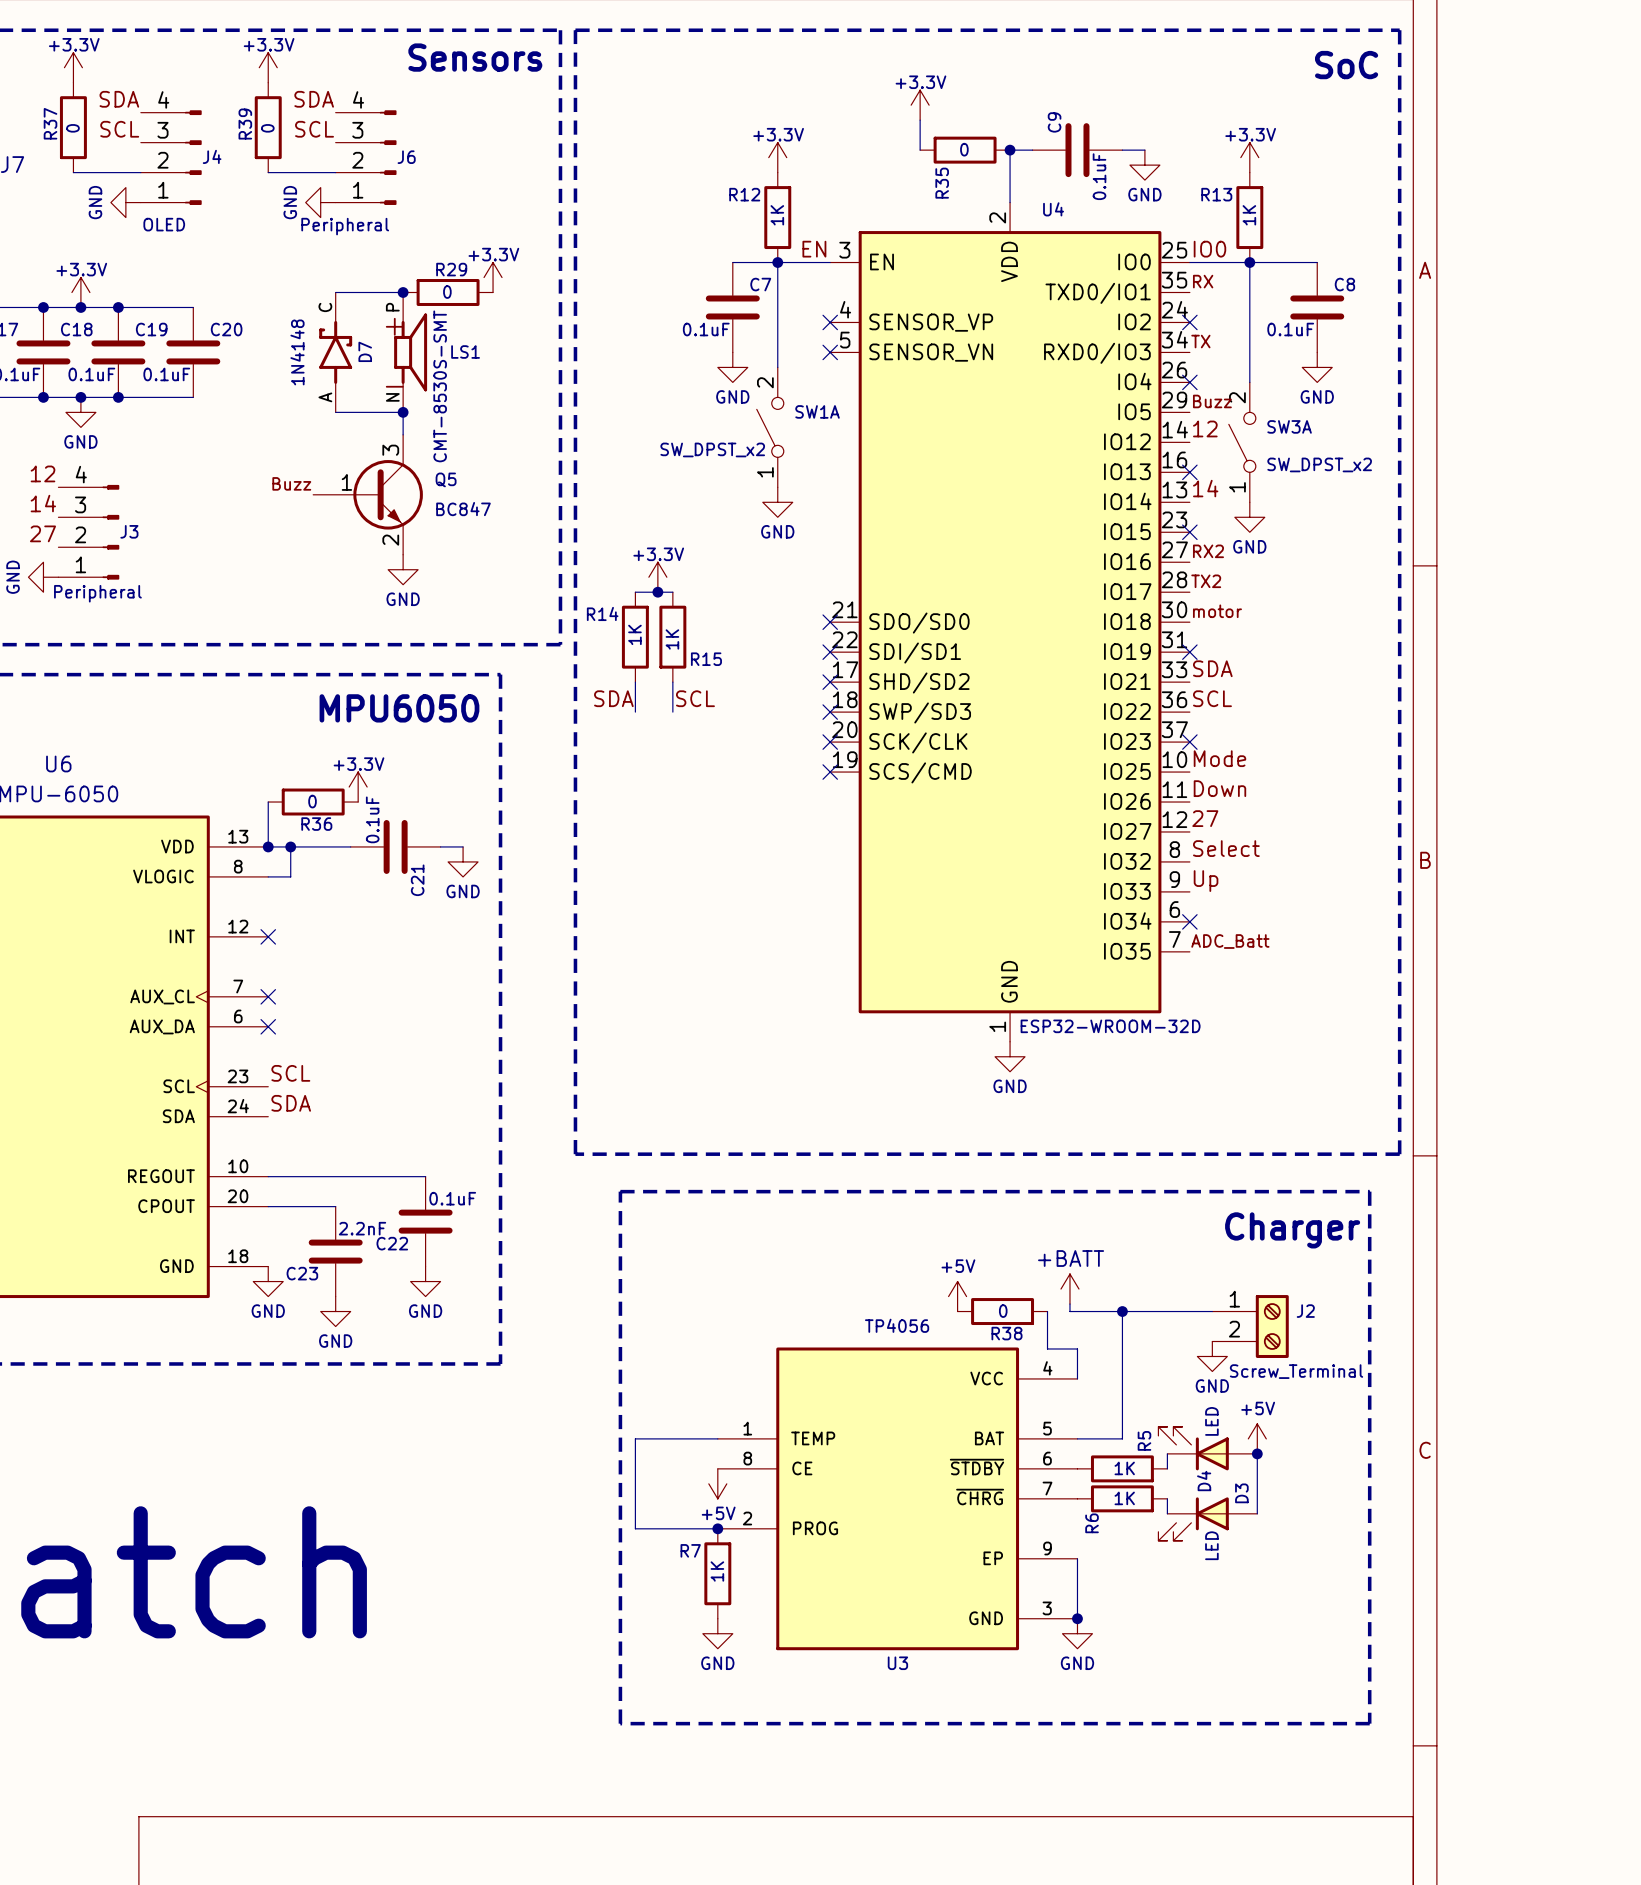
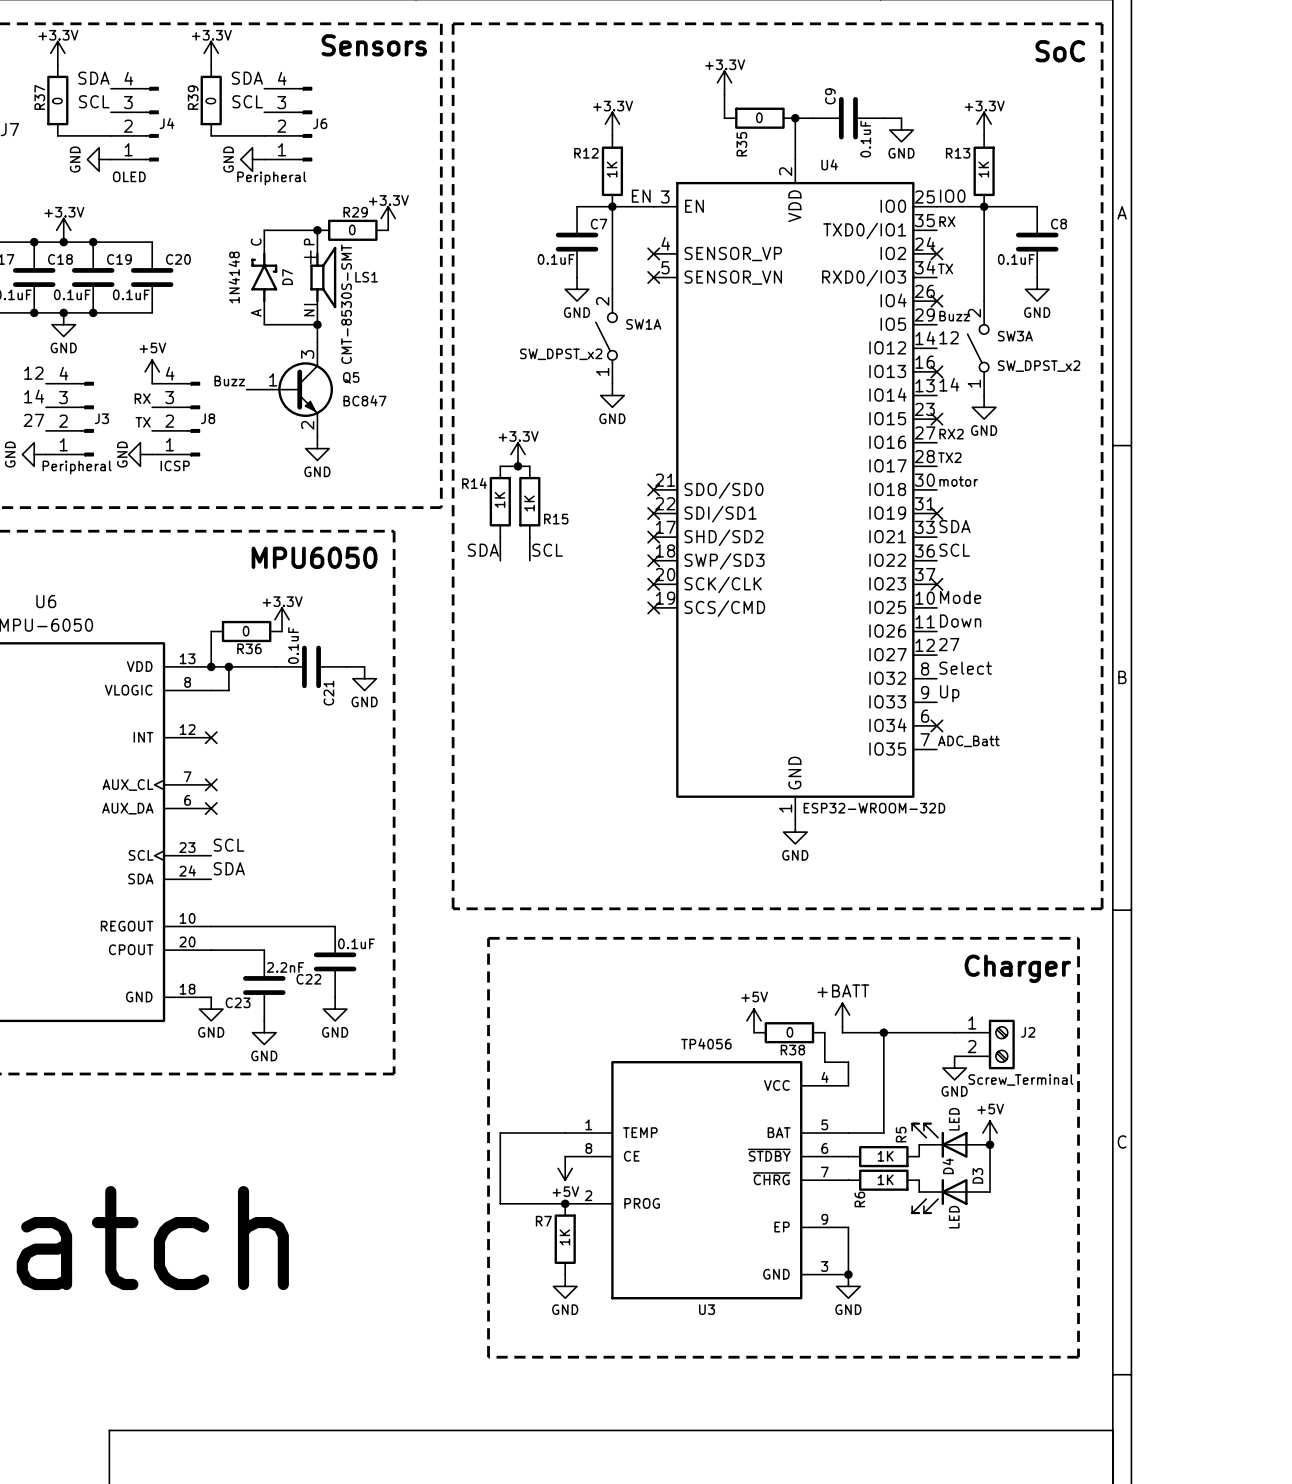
power symbol: none -> +5V (152, 371)
label: none -> RX (142, 398)
J8: none -> ICSP (176, 419)
label: none -> TX (143, 422)
power symbol: none -> GND (140, 454)

